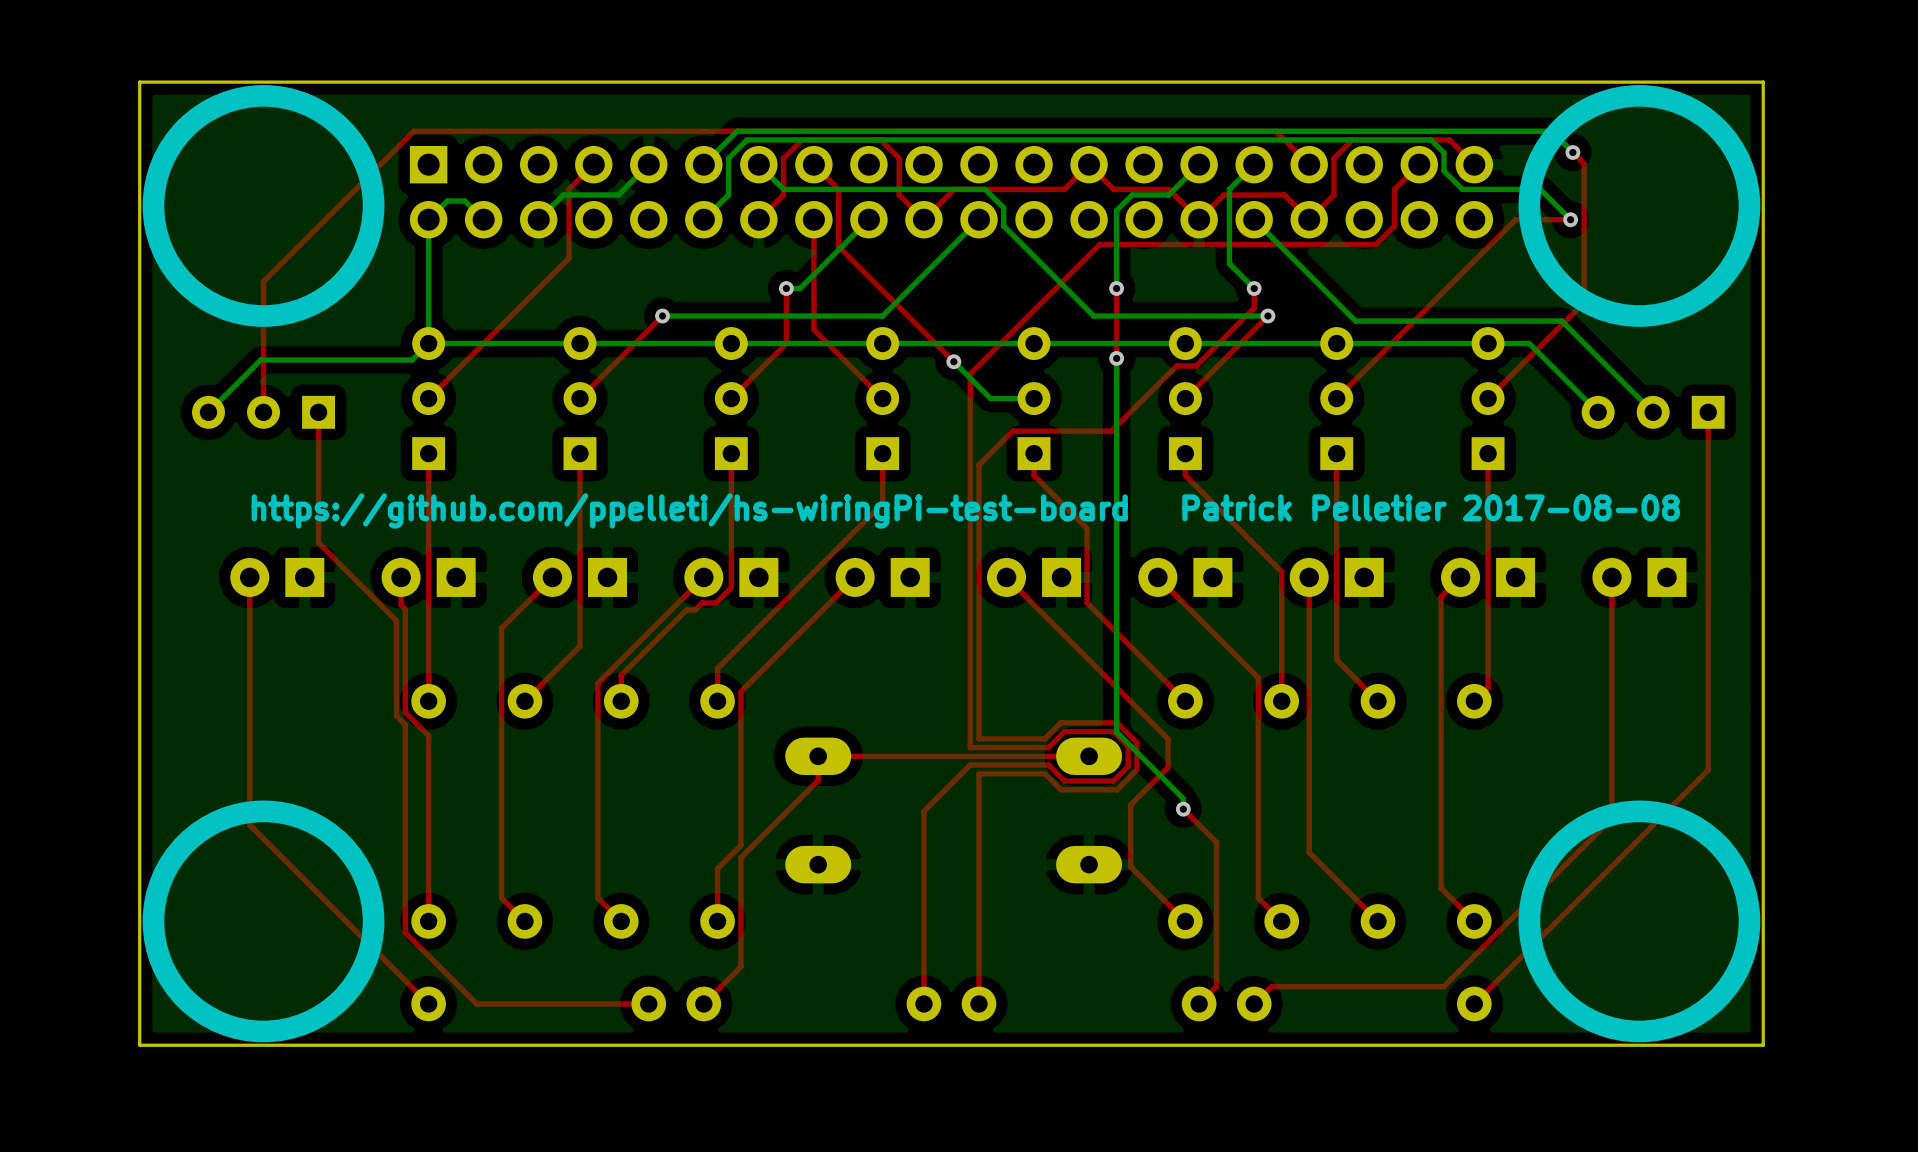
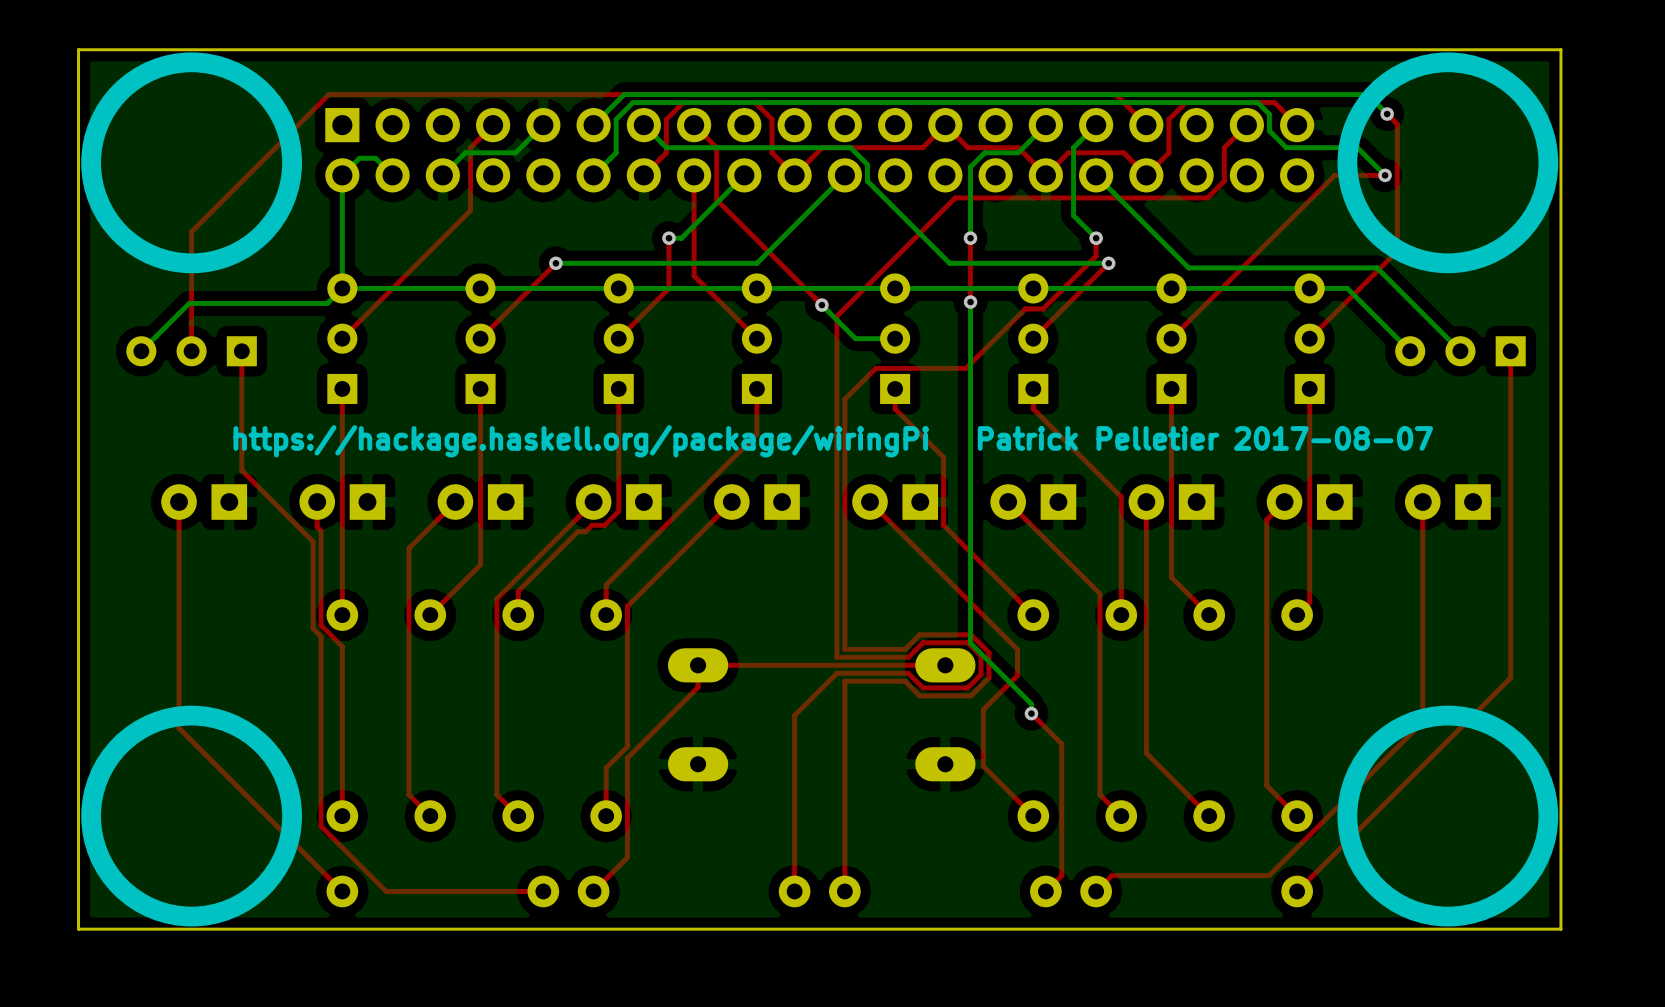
text: https://github.com/ppelleti/hs-wiringPi-test-board Patrick Pelletier 2017-08-08 (965, 510) -> https://hackage.haskell.org/package/wiringPi Patrick Pelletier 2017-08-07 (833, 441)

